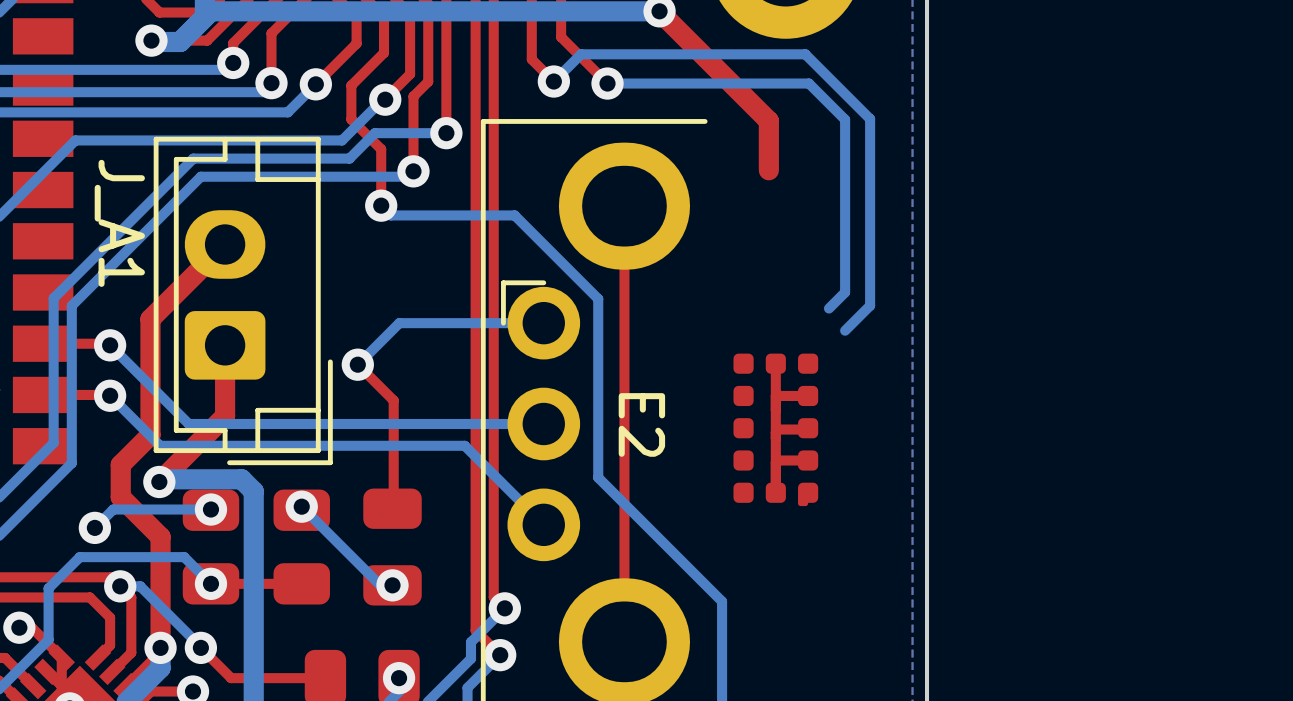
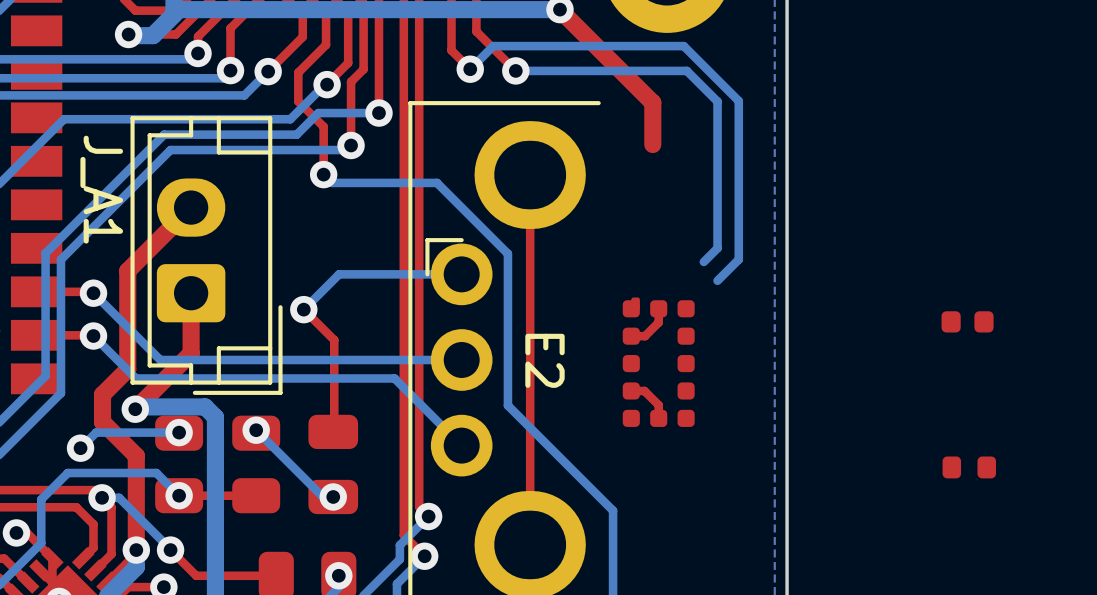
top track: (775, 379) (775, 477) -> (631, 390) (644, 390) (658, 405)
top track: none -> (658, 322) (645, 336) (631, 336)
part: none -> (967, 321)
top track: (808, 395) (775, 395) -> none
part rotation: 0° (775, 429) -> 180° (658, 362)
top track: (806, 429) (778, 429) (775, 432) -> none
top track: (808, 460) (777, 460) (775, 462) -> none
part: none -> (969, 467)

